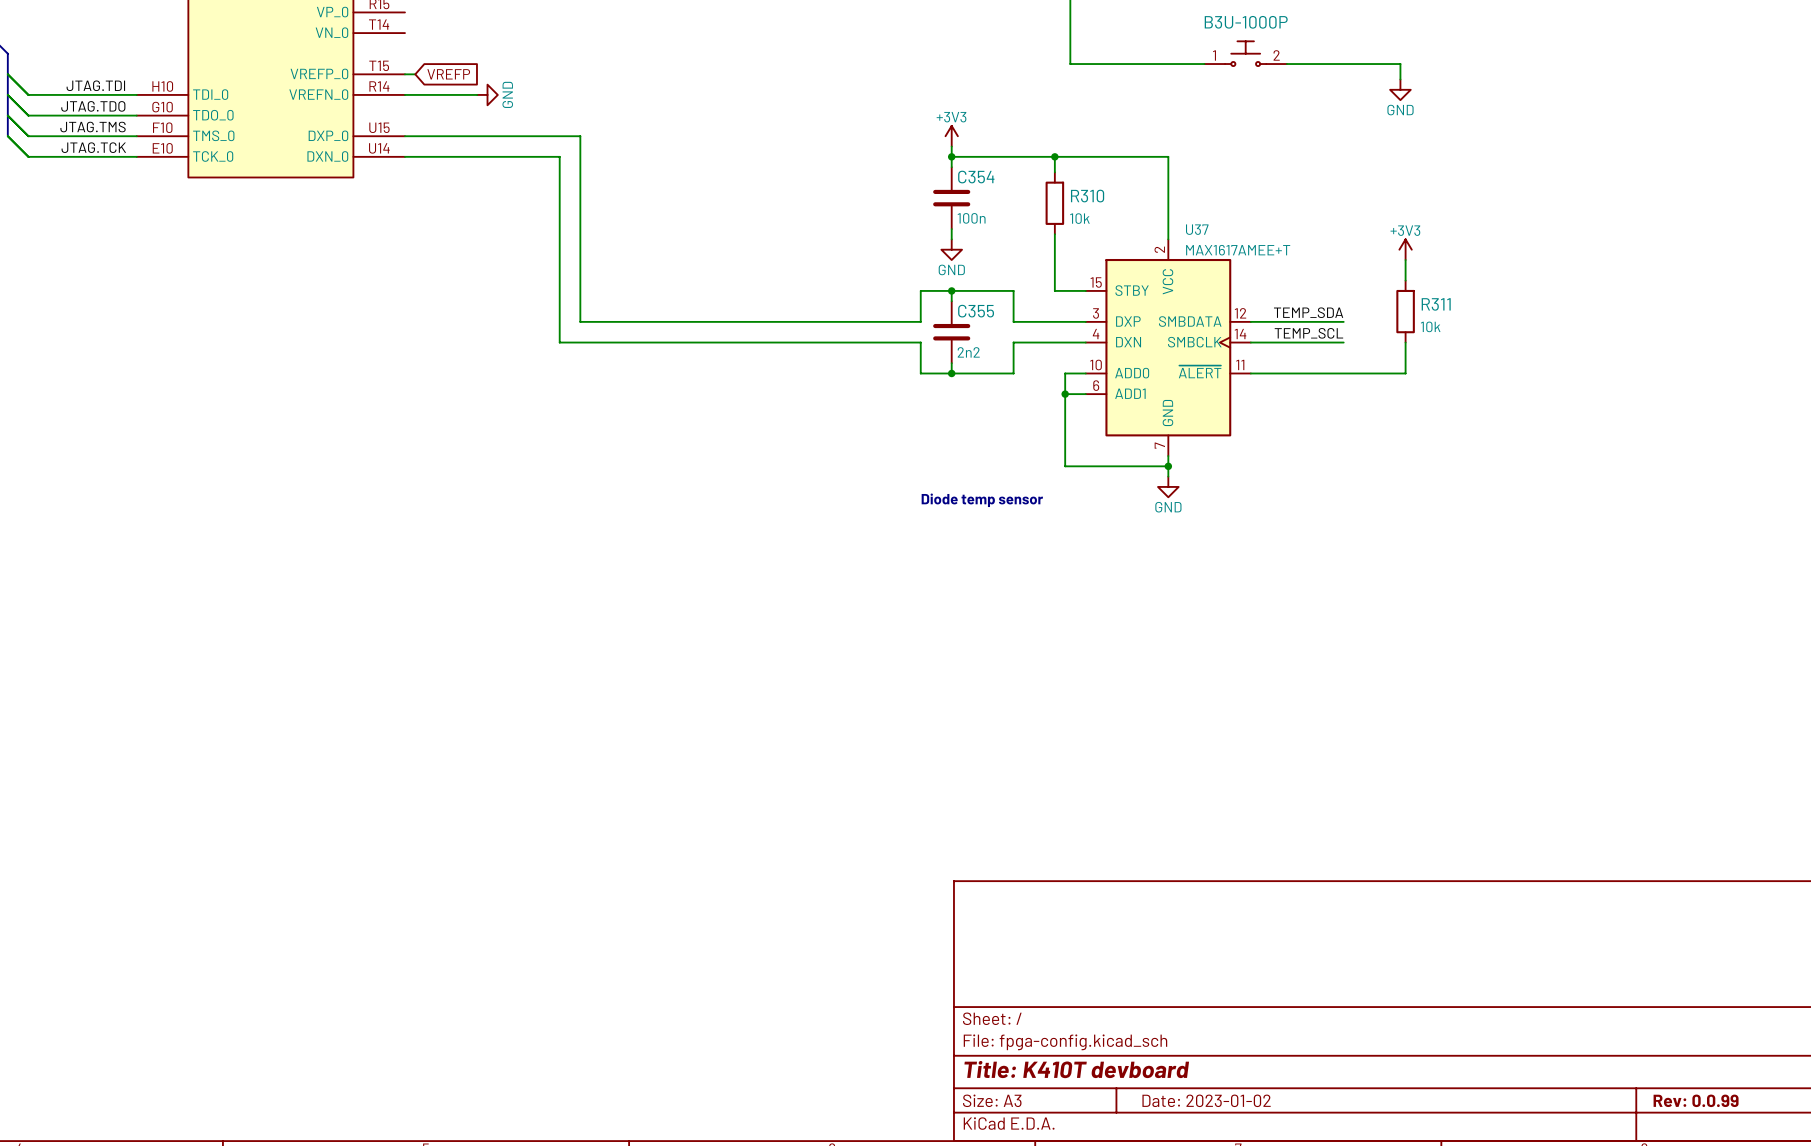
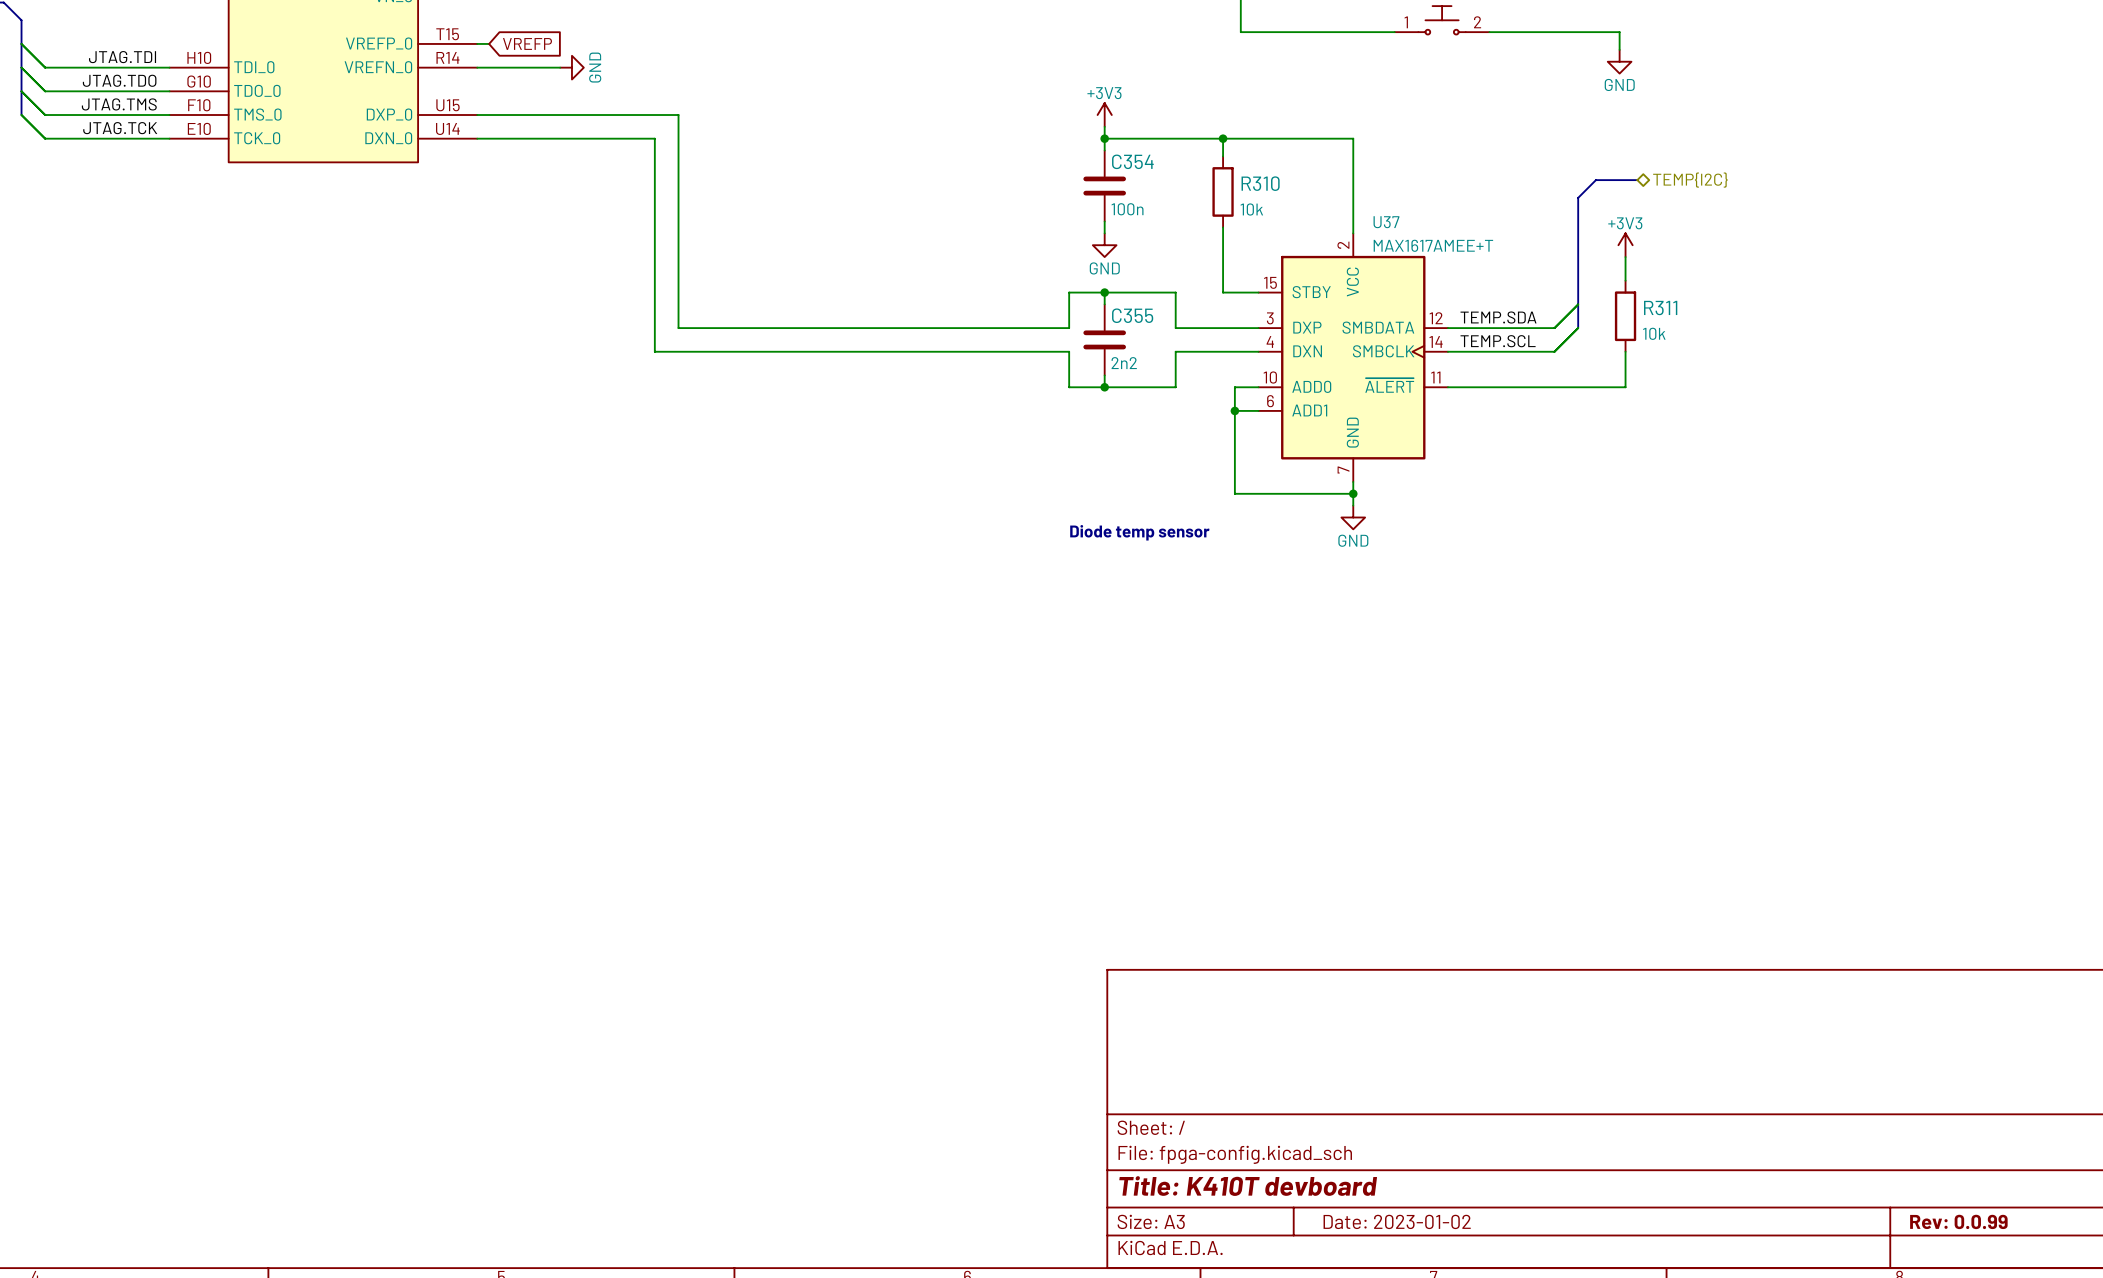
bus: none -> (1637, 180) (1595, 180) (1578, 197) (1578, 328)
hierarchical label: none -> TEMP{I2C} (1690, 180)
wire: none -> (1578, 304) (1554, 328)
label: none -> TEMP.SDA (1498, 317)
label: TEMP_SDA (1308, 312) -> none
wire: none -> (1578, 328) (1554, 351)
label: none -> TEMP.SCL (1498, 341)
label: TEMP_SCL (1308, 333) -> none

